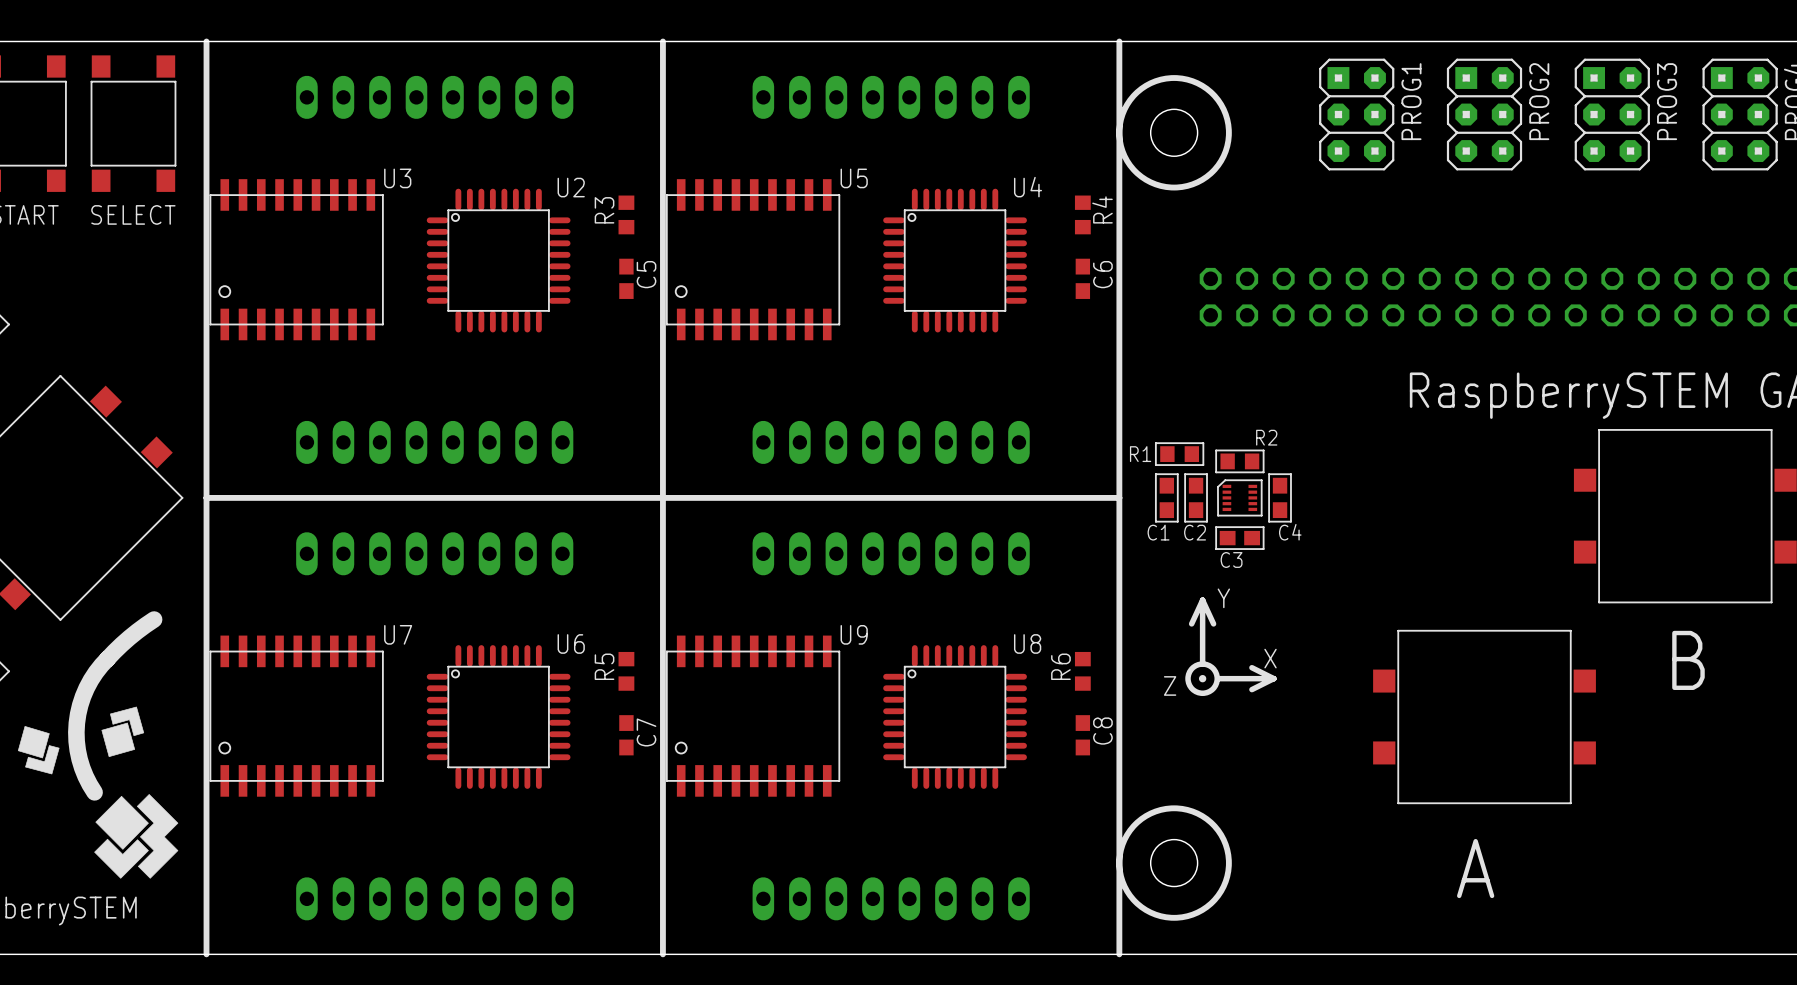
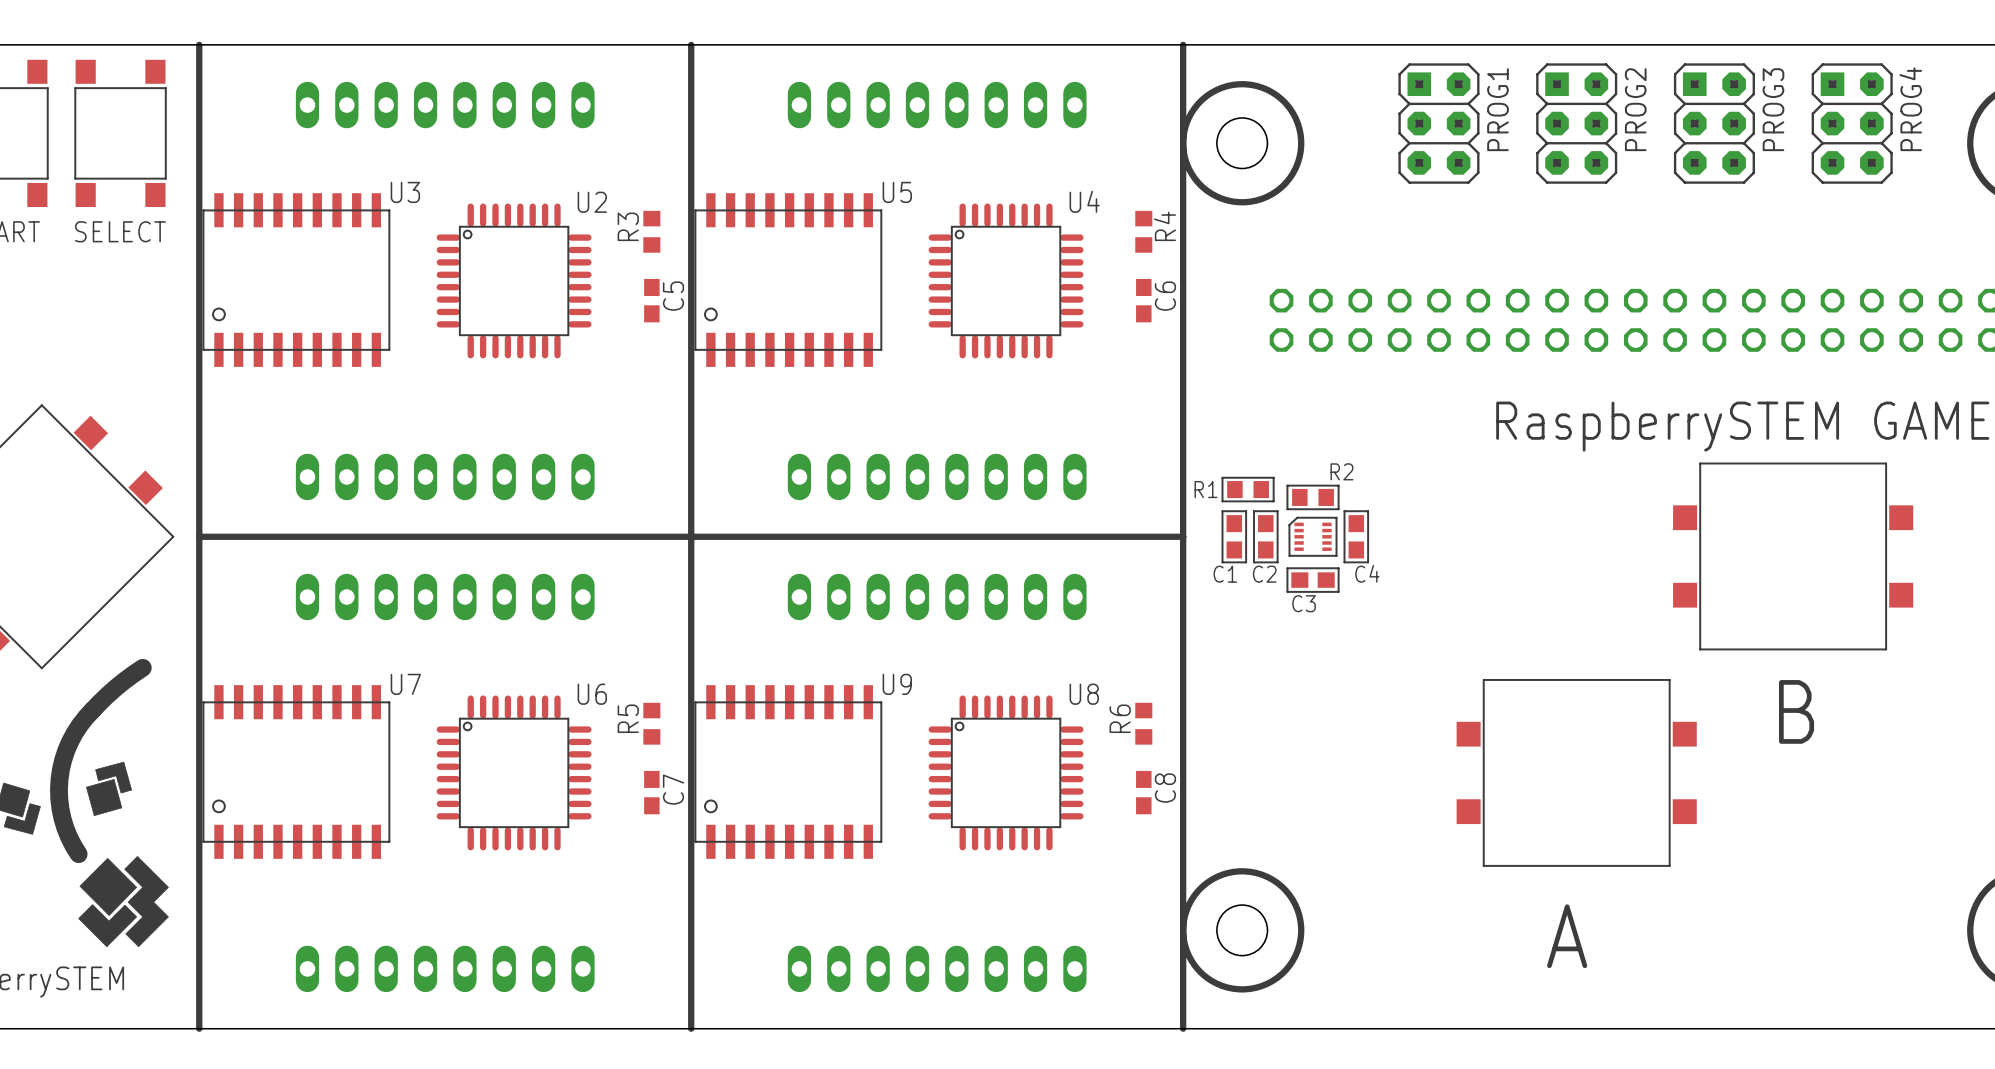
text: Y (1223, 598) -> none
line: (1202, 600) (1202, 664) -> none
line: (1202, 600) (1191, 623) -> none
line: (1202, 600) (1213, 623) -> none
text: X (1270, 658) -> none
drawing: [1185, 661, 1220, 697] -> none
line: (1251, 667) (1273, 678) -> none
line: (1219, 678) (1273, 678) -> none
line: (1273, 678) (1251, 689) -> none
text: Z (1170, 685) -> none

